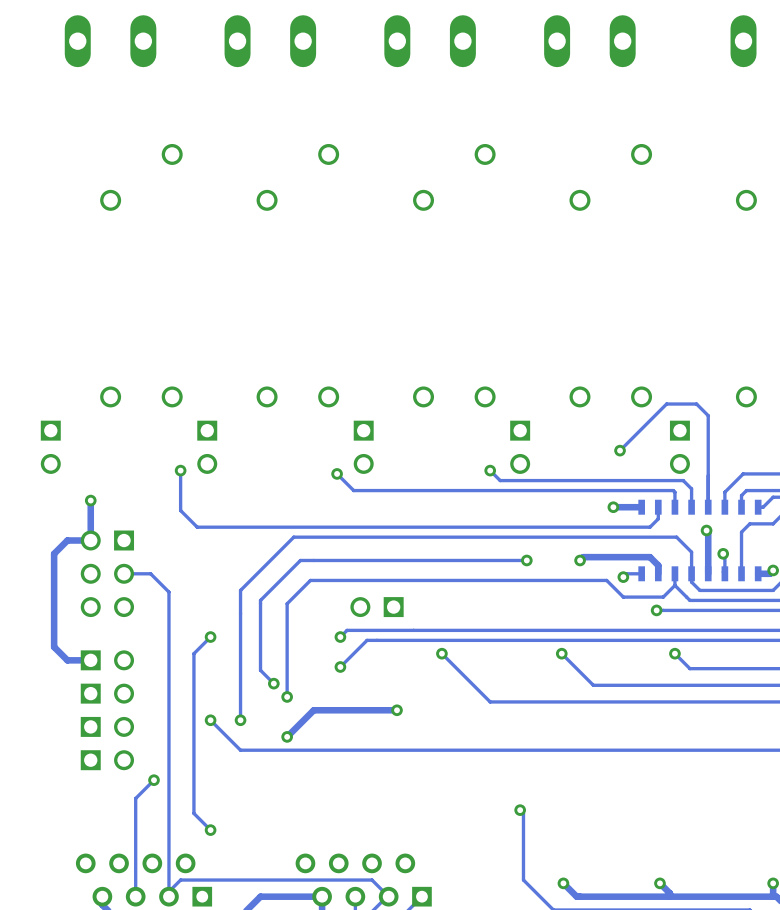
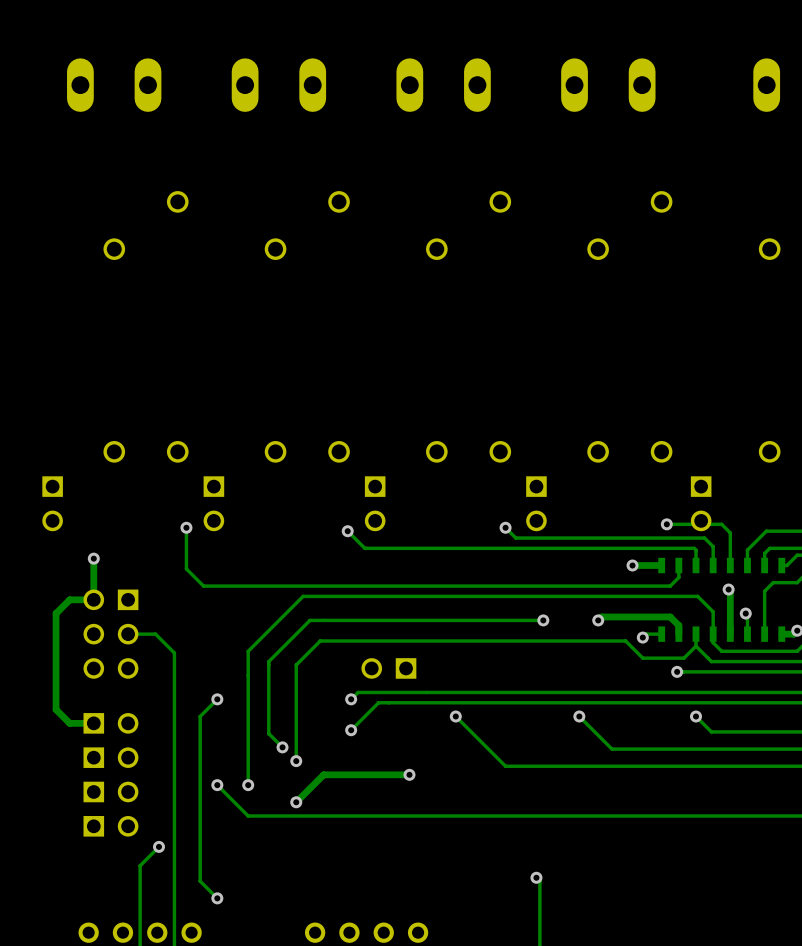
track: (620, 450) (666, 404) (696, 404) (708, 415) (708, 475) -> (666, 524) (721, 524) (730, 532)
via position: (620, 450) -> (666, 524)

